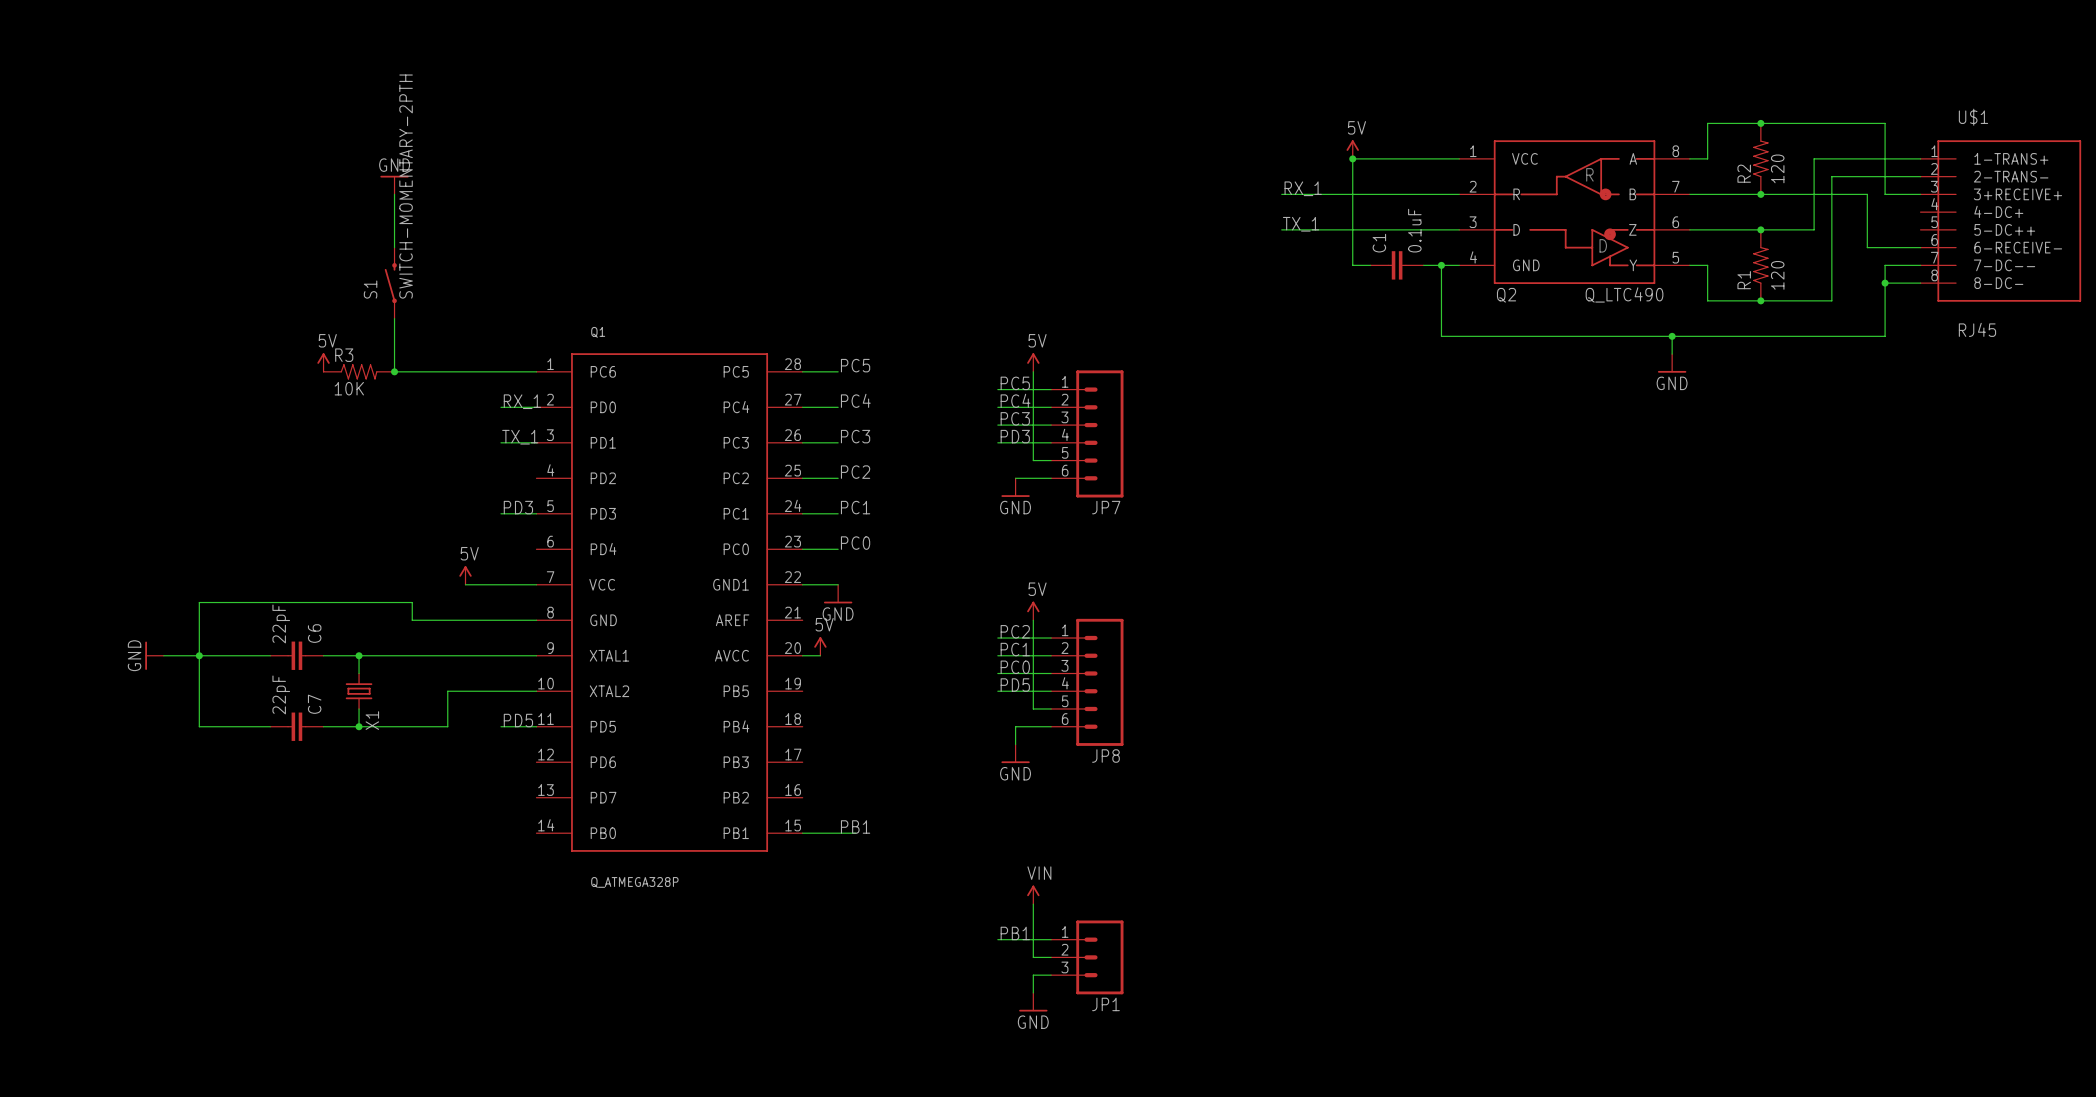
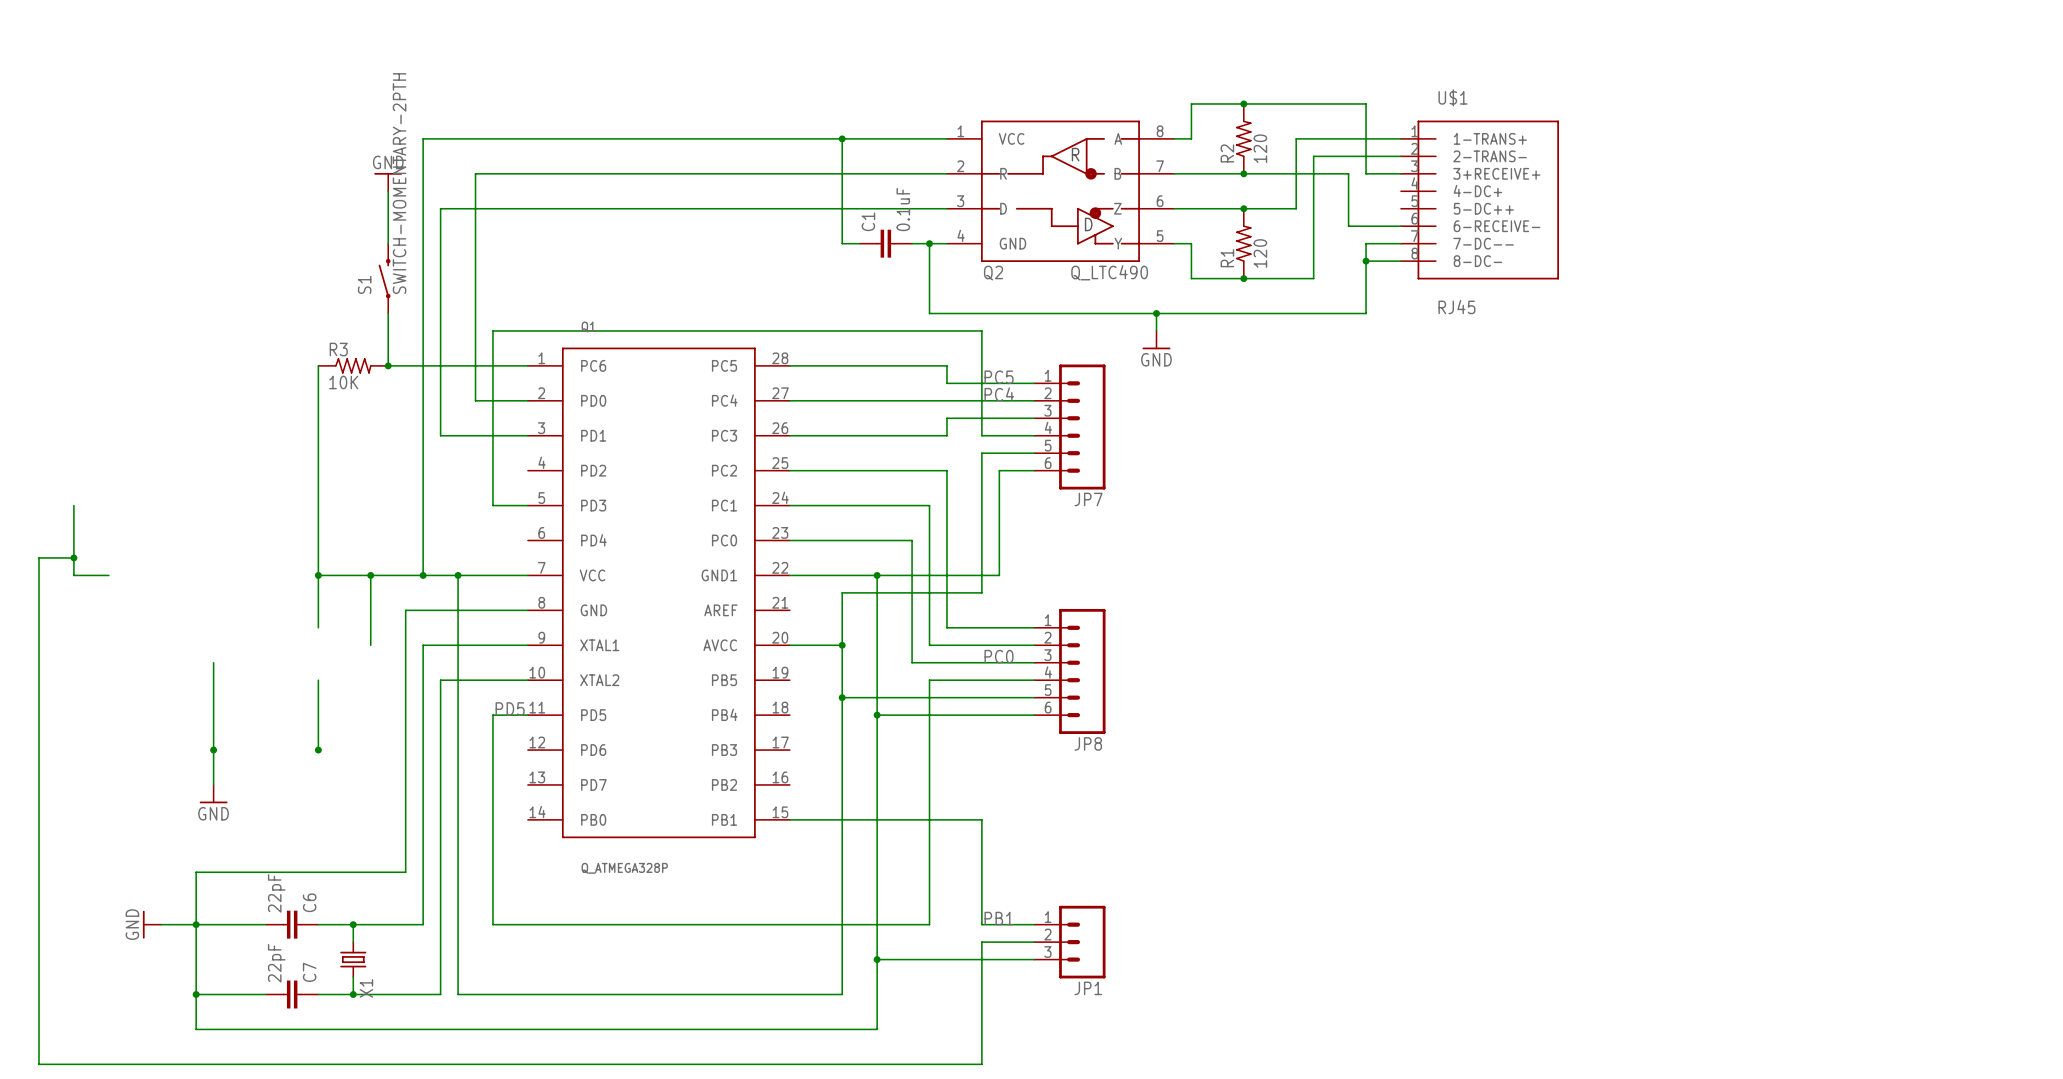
junction: none -> (1243, 103)
junction: (1760, 123) -> none
wire: none -> (842, 138) (842, 243) (859, 243)
junction: none -> (842, 138)
wire: none -> (946, 138) (423, 138) (423, 575)
wire: none -> (1173, 138) (1191, 138) (1191, 103) (1366, 103) (1366, 173) (1400, 173)
wire: none -> (1400, 138) (1296, 138) (1296, 208) (1173, 208)
power symbol: 5V (1352, 149) -> none
wire: (1352, 158) (1352, 265) (1370, 265) -> (1331, 156) (1313, 156) (1313, 278) (1191, 278) (1191, 243) (1173, 243)
junction: (1352, 158) -> none
wire: (1689, 158) (1707, 158) (1707, 123) (1885, 123) (1885, 194) (1920, 194) -> none
R2 position: (1760, 158) -> (1243, 138)
wire: (1920, 158) (1814, 158) (1814, 229) (1689, 229) -> none
wire: none -> (946, 173) (475, 173) (475, 400) (492, 400)
junction: none -> (1243, 173)
wire: (1920, 176) (1831, 176) (1831, 300) (1707, 300) (1707, 265) (1689, 265) -> none
label: RX_1 (1303, 188) -> none
wire: (1281, 194) (1459, 194) -> none
wire: (1689, 194) (1867, 194) (1867, 247) (1920, 247) -> none
junction: (1760, 194) -> none
wire: none -> (946, 208) (440, 208) (440, 435) (492, 435)
junction: none -> (1243, 208)
Q2 position: (1574, 212) -> (1060, 191)
U$1 position: (2000, 221) -> (1479, 200)
label: TX_1 (1301, 224) -> none
wire: (1281, 229) (1370, 229) -> (1173, 173) (1348, 173) (1348, 226)
junction: (1760, 229) -> none
wire: none -> (912, 243) (946, 243)
wire: none -> (929, 243) (929, 313) (1366, 313) (1366, 243) (1400, 243)
junction: none -> (929, 243)
junction: none -> (1366, 261)
C1 position: (1397, 265) -> (885, 243)
wire: (1441, 265) (1441, 336) (1885, 336) (1885, 265) (1920, 265) -> none
junction: (1441, 265) -> none
R1 position: (1760, 265) -> (1243, 243)
junction: none -> (1243, 278)
wire: (1885, 283) (1920, 283) -> none
junction: (1885, 283) -> none
junction: (1760, 300) -> none
wire: none -> (1156, 313) (1156, 330)
junction: none -> (1156, 313)
wire: (1672, 336) (1672, 354) -> none
junction: (1672, 336) -> none
power symbol: none -> GND (1156, 340)
power symbol: 5V (323, 362) -> none
power symbol: 5V (1033, 362) -> none
power symbol: GND (1672, 363) -> none
label: PC5 (855, 365) -> none
wire: none -> (318, 365) (318, 627)
wire: none -> (824, 365) (946, 365) (946, 383) (981, 383)
wire: (1033, 371) (1033, 460) -> (318, 575) (458, 575) (458, 994) (842, 994) (842, 592) (981, 592) (981, 453) (1016, 453)
label: PC4 (855, 400) -> none
label: RX_1 (522, 401) -> none
wire: none -> (824, 400) (981, 400)
label: PC3 (1015, 418) -> none
wire: none -> (981, 418) (946, 418) (946, 435) (824, 435)
label: PC3 (855, 436) -> none
label: PD3 (1015, 436) -> none
label: TX_1 (520, 437) -> none
wire: none -> (981, 435) (981, 330) (492, 330) (492, 505)
label: PC2 (855, 472) -> none
wire: none -> (824, 470) (946, 470) (946, 627) (981, 627)
wire: none -> (999, 470) (999, 575) (824, 575)
power symbol: GND (1015, 487) -> none
label: PD3 (518, 507) -> none
label: PC1 (855, 507) -> none
wire: none -> (73, 505) (73, 575) (108, 575)
wire: none -> (824, 505) (929, 505) (929, 645) (981, 645)
label: PC0 (855, 543) -> none
wire: none -> (824, 540) (912, 540) (912, 662) (981, 662)
junction: none -> (73, 557)
power symbol: 5V (465, 575) -> none
junction: none -> (318, 575)
wire: none -> (370, 575) (370, 645)
junction: none -> (370, 575)
junction: none -> (423, 575)
junction: none -> (458, 575)
junction: none -> (877, 575)
power symbol: GND (838, 594) -> none
power symbol: 5V (1033, 610) -> none
wire: (412, 620) (412, 602) (199, 602) (199, 726) (270, 726) -> (405, 610) (405, 872) (196, 872) (196, 1029) (877, 1029) (877, 575)
wire: (1033, 620) (1033, 708) -> (842, 697) (1016, 697)
label: PC2 (1015, 631) -> none
power symbol: 5V (820, 646) -> none
label: PC1 (1015, 649) -> none
power symbol: GND (154, 655) -> none
wire: (163, 655) (270, 655) -> none
junction: (199, 655) -> none
C6 position: (296, 655) -> (292, 924)
wire: (323, 655) (430, 655) -> (318, 924) (423, 924) (423, 645)
wire: (359, 655) (359, 673) -> none
junction: (359, 655) -> none
wire: none -> (807, 645) (842, 645)
junction: none -> (842, 645)
wire: none -> (213, 662) (213, 784)
label: PD5 (1015, 685) -> none
wire: none -> (318, 680) (318, 750)
X1 position: (359, 691) -> (353, 959)
wire: none -> (981, 680) (929, 680) (929, 924) (492, 924) (492, 715)
wire: (359, 708) (359, 726) -> none
junction: none -> (842, 697)
C7 position: (296, 726) -> (292, 994)
wire: (323, 726) (447, 726) -> (318, 994) (440, 994) (440, 715)
junction: (359, 726) -> none
junction: none -> (877, 715)
wire: (1015, 726) (1015, 744) -> (999, 715) (877, 715)
power symbol: GND (1015, 753) -> none
junction: none -> (213, 750)
junction: none -> (318, 750)
power symbol: none -> GND (213, 794)
label: PB1 (855, 826) -> none
wire: none -> (842, 819) (981, 819) (981, 924)
power symbol: VIN (1033, 894) -> none
wire: (1033, 904) (1033, 957) -> (73, 557) (38, 557) (38, 1064) (981, 1064) (981, 942) (1016, 942)
power symbol: none -> GND (152, 924)
wire: none -> (161, 924) (265, 924)
junction: none -> (196, 924)
wire: none -> (353, 924) (353, 942)
junction: none -> (353, 924)
junction: none -> (877, 959)
wire: (1033, 975) (1033, 992) -> (1016, 959) (877, 959)
wire: none -> (353, 977) (353, 994)
power symbol: GND (1033, 1002) -> none
wire: none -> (196, 994) (265, 994)
junction: none -> (196, 994)
junction: none -> (353, 994)

